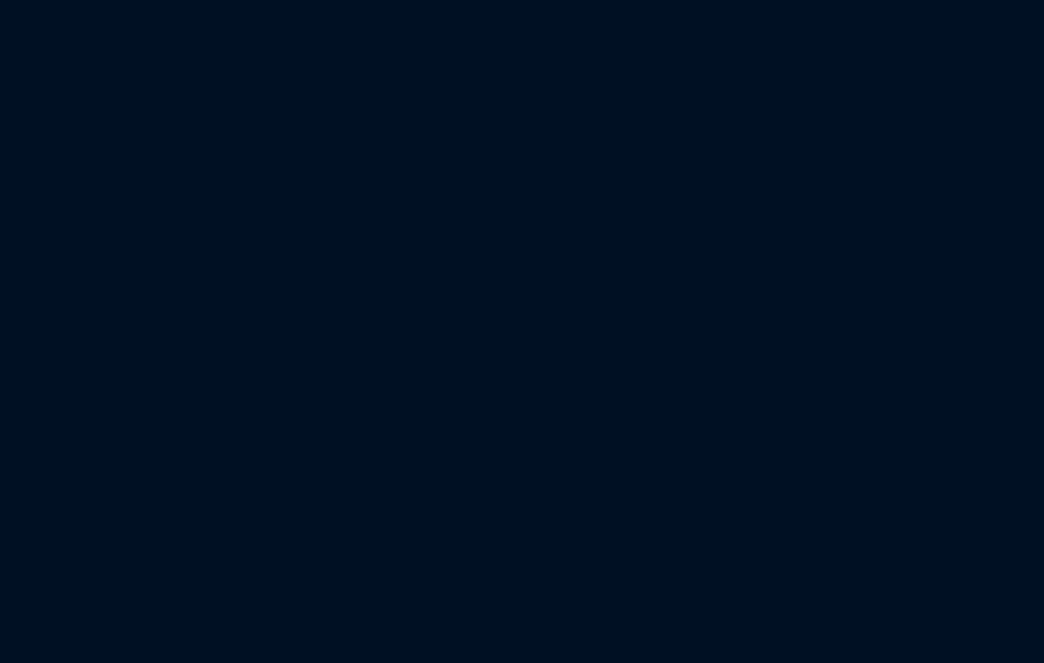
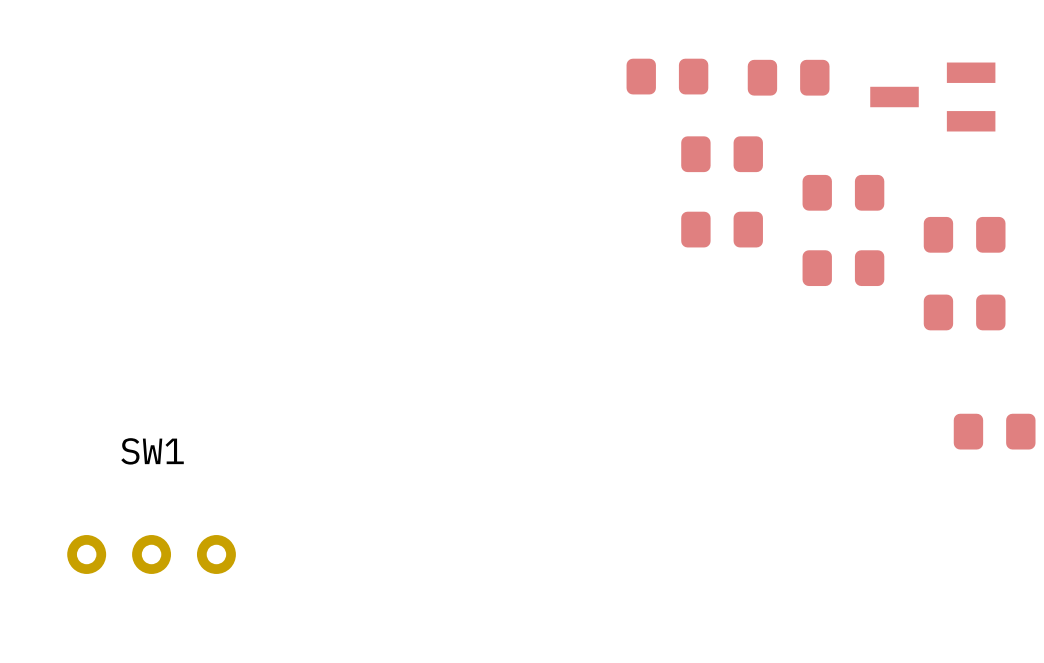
part: none -> (667, 76)
part: none -> (788, 77)
part: none -> (932, 97)
part: none -> (722, 154)
part: none -> (843, 192)
part: none -> (722, 229)
part: none -> (964, 234)
part: none -> (843, 268)
part: none -> (964, 312)
part: none -> (994, 431)
SW1: none -> (151, 554)

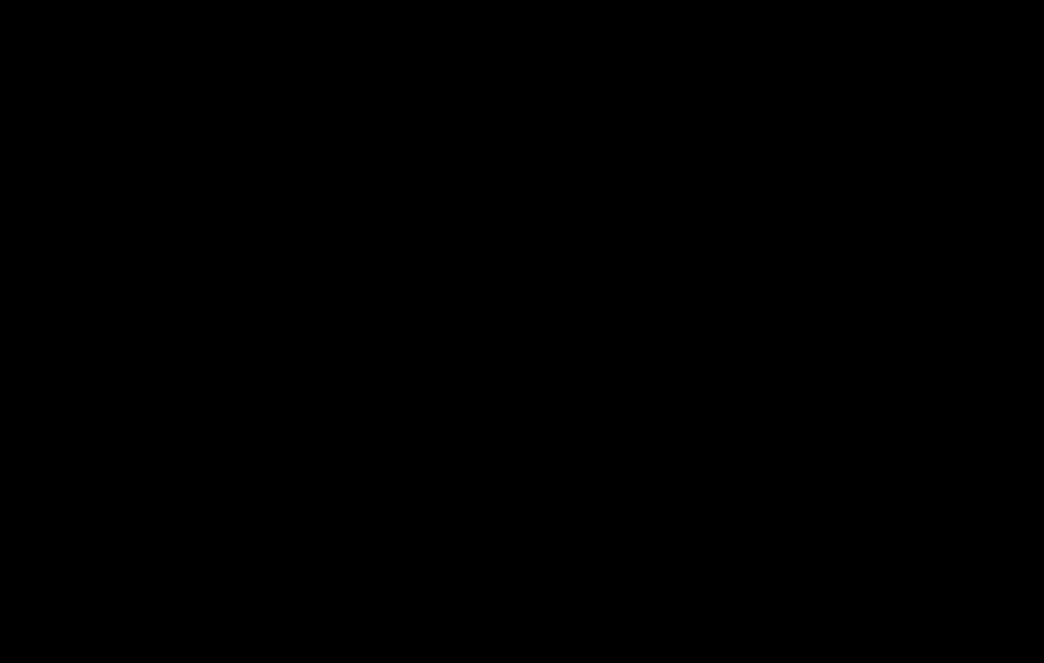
part: (667, 76) -> none
part: (788, 77) -> none
part: (932, 97) -> none
part: (722, 154) -> none
part: (843, 192) -> none
part: (722, 229) -> none
part: (964, 234) -> none
part: (843, 268) -> none
part: (964, 312) -> none
part: (994, 431) -> none
SW1: (151, 554) -> none

